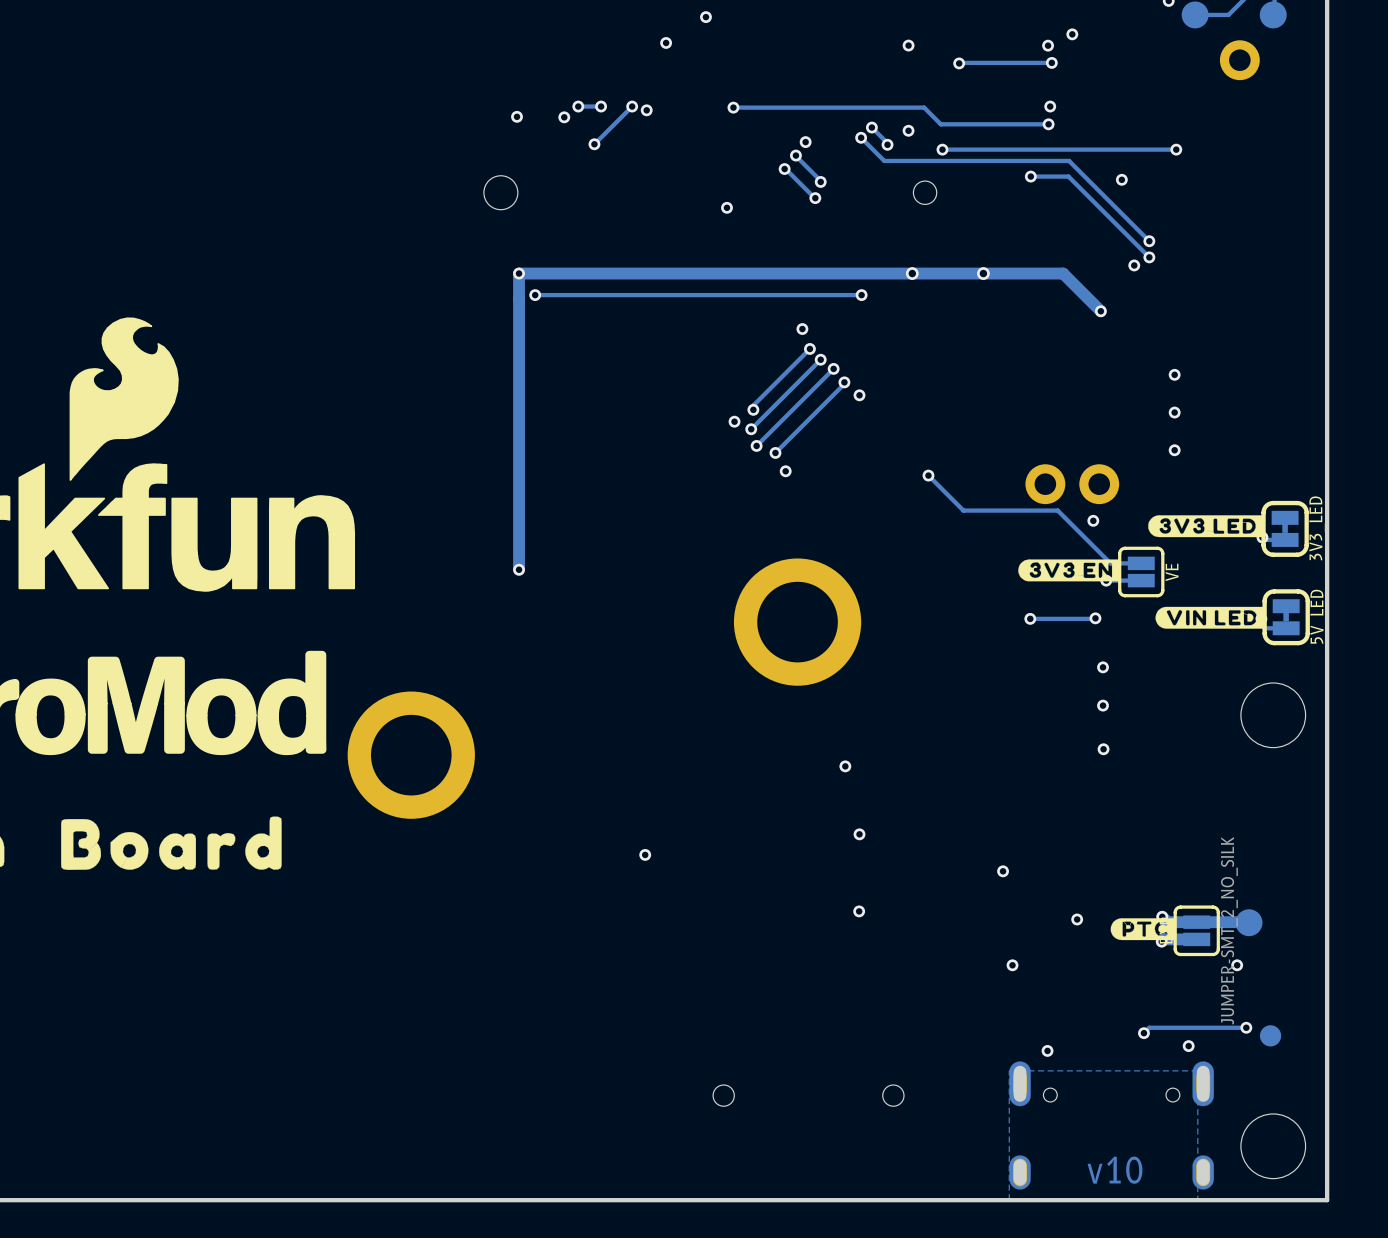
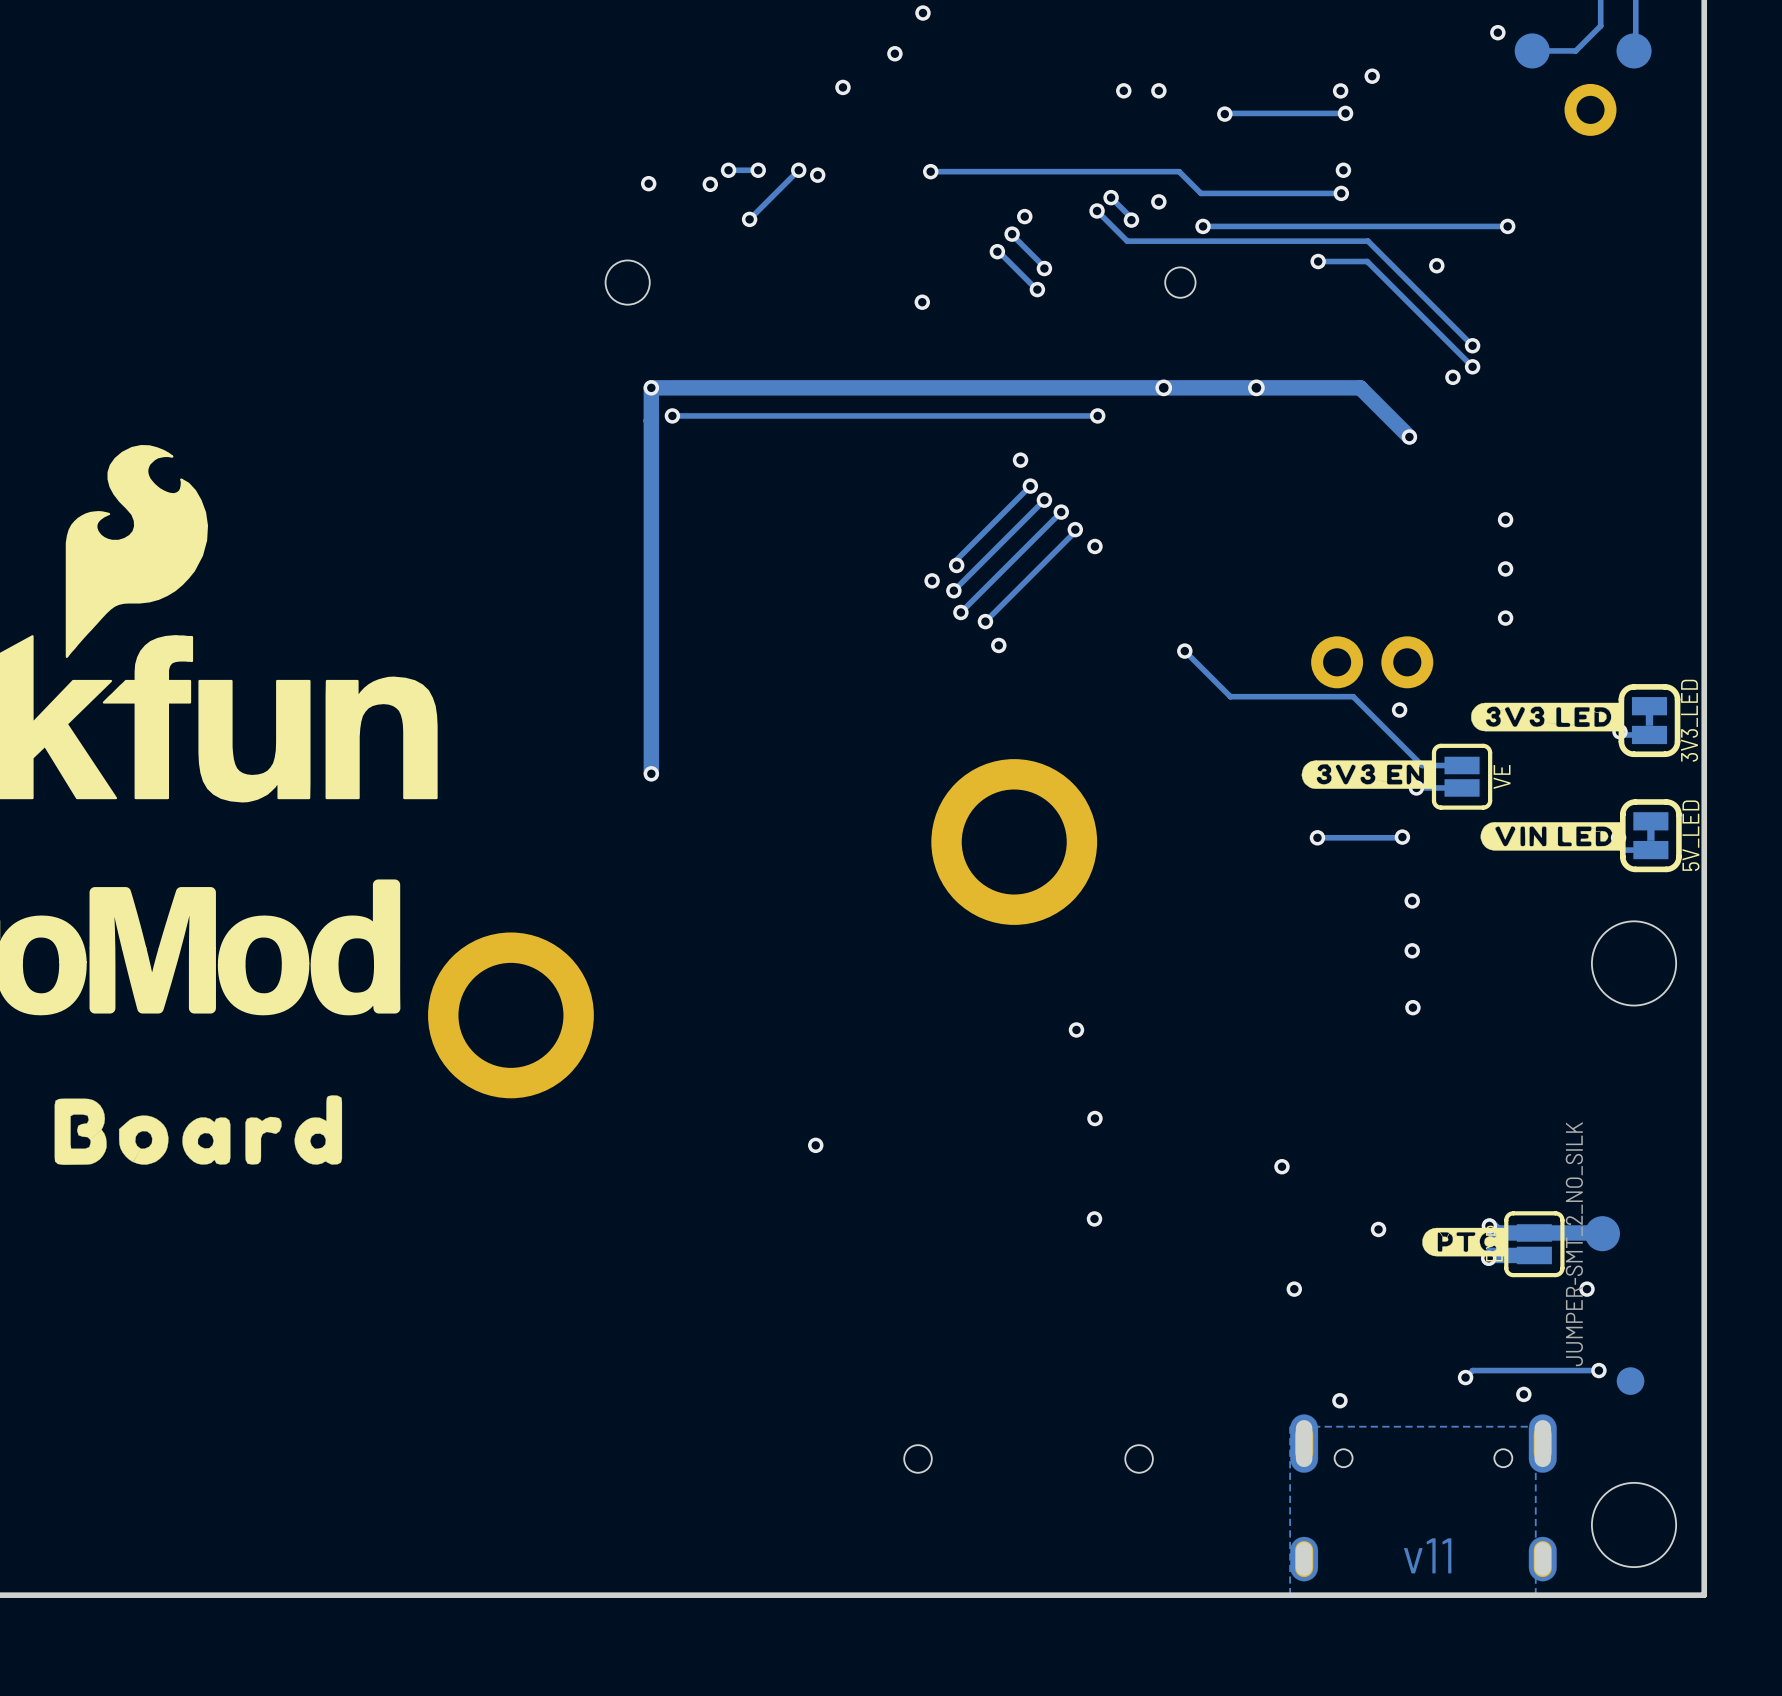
via: none -> (1123, 90)
text: v10 (1114, 1170) -> v11 (1427, 1555)

